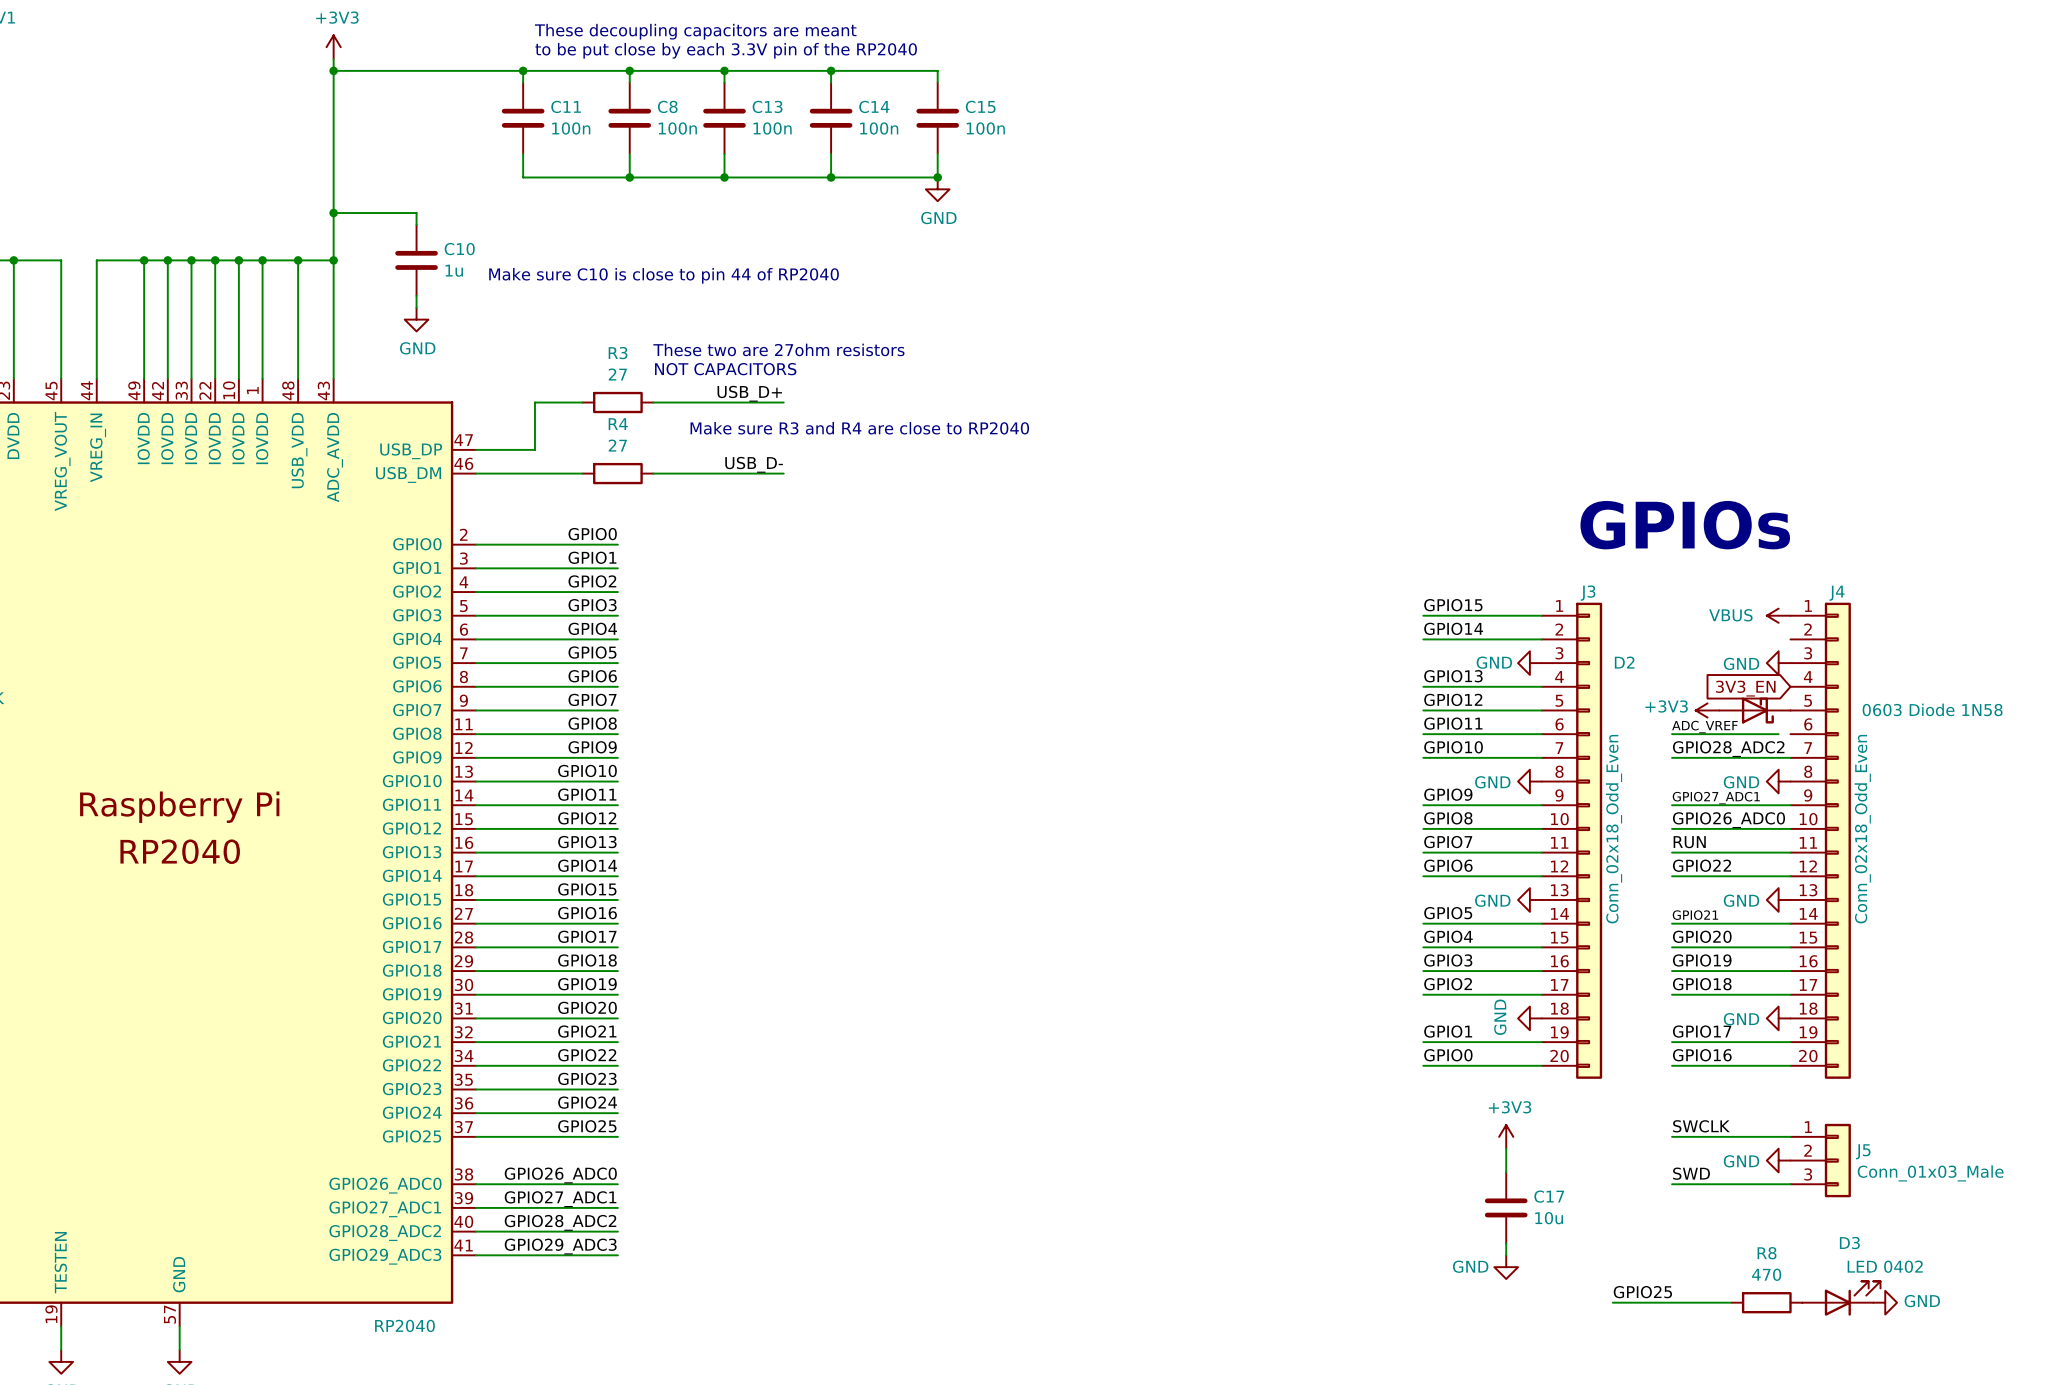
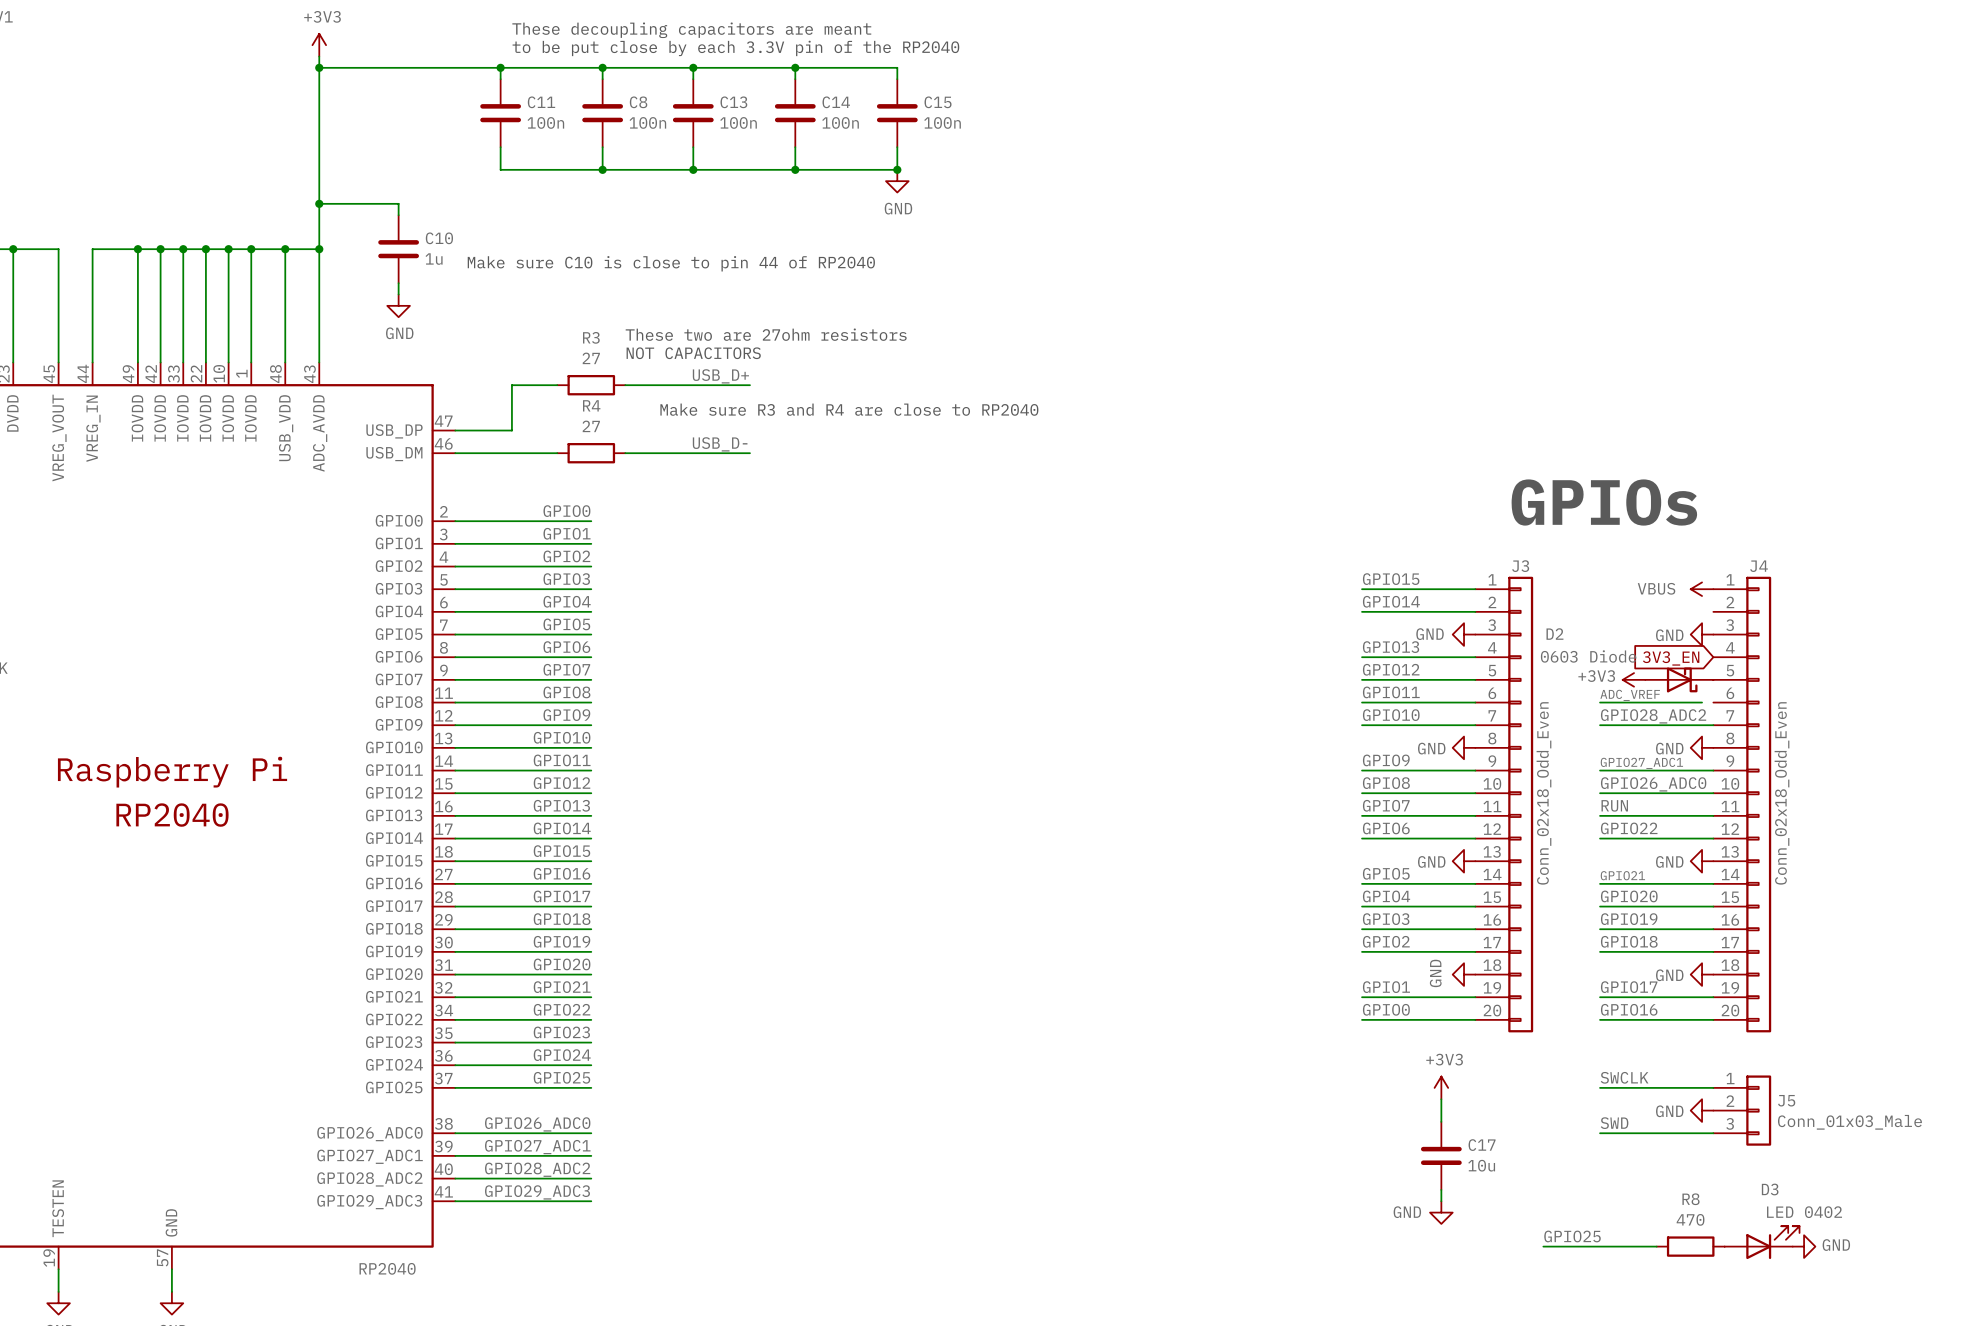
D2 value: 0603 Diode 1N58 (1932, 709) -> 0603 Diode (1588, 656)

